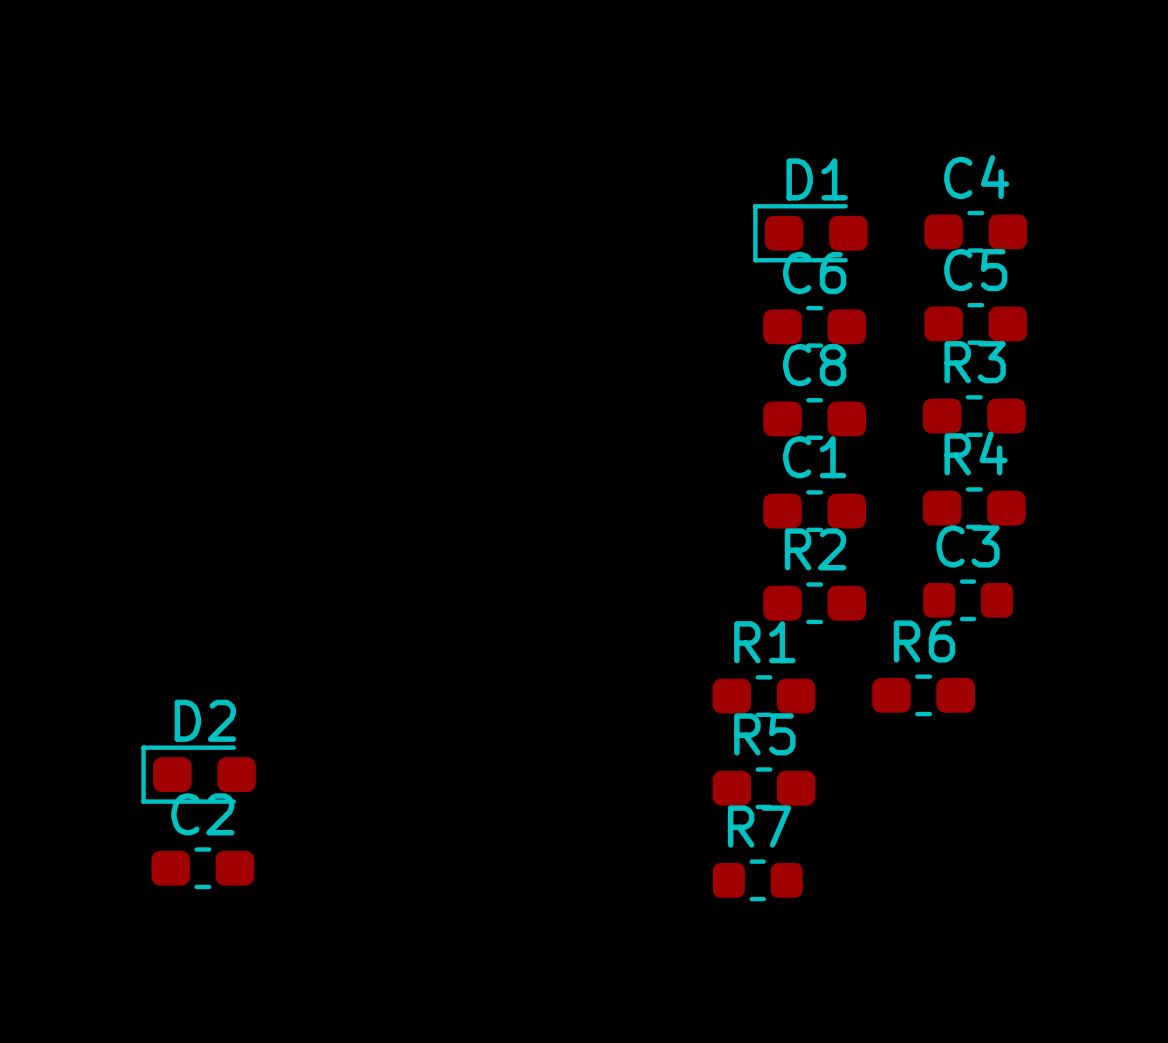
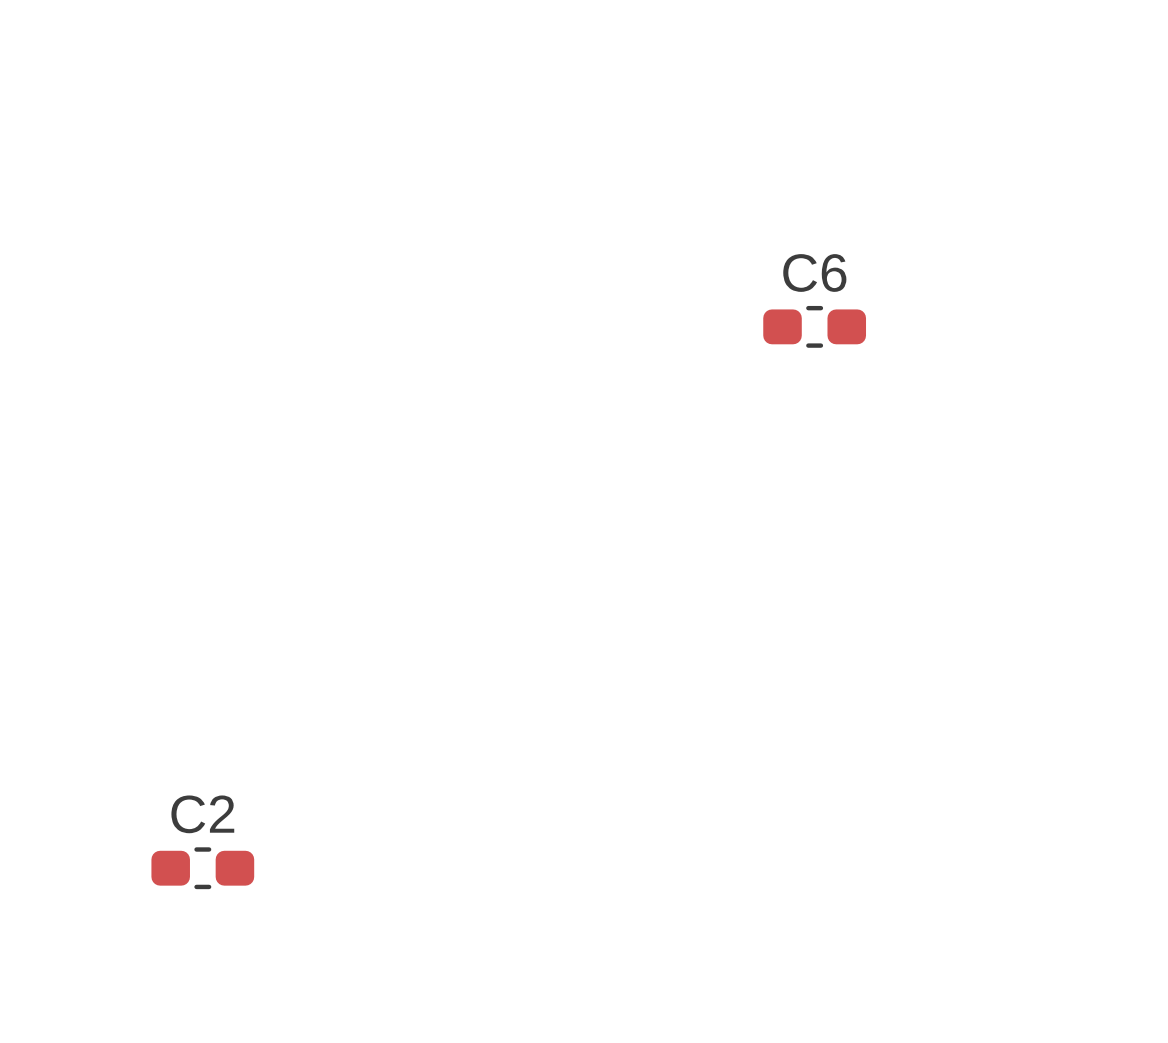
C4: (975, 231) -> none
D1: (810, 233) -> none
C5: (975, 323) -> none
R3: (974, 416) -> none
C8: (814, 418) -> none
R4: (974, 508) -> none
C1: (814, 511) -> none
C3: (968, 600) -> none
R2: (814, 603) -> none
R6: (923, 695) -> none
R1: (763, 696) -> none
D2: (198, 774) -> none
R5: (763, 788) -> none
R7: (757, 880) -> none

